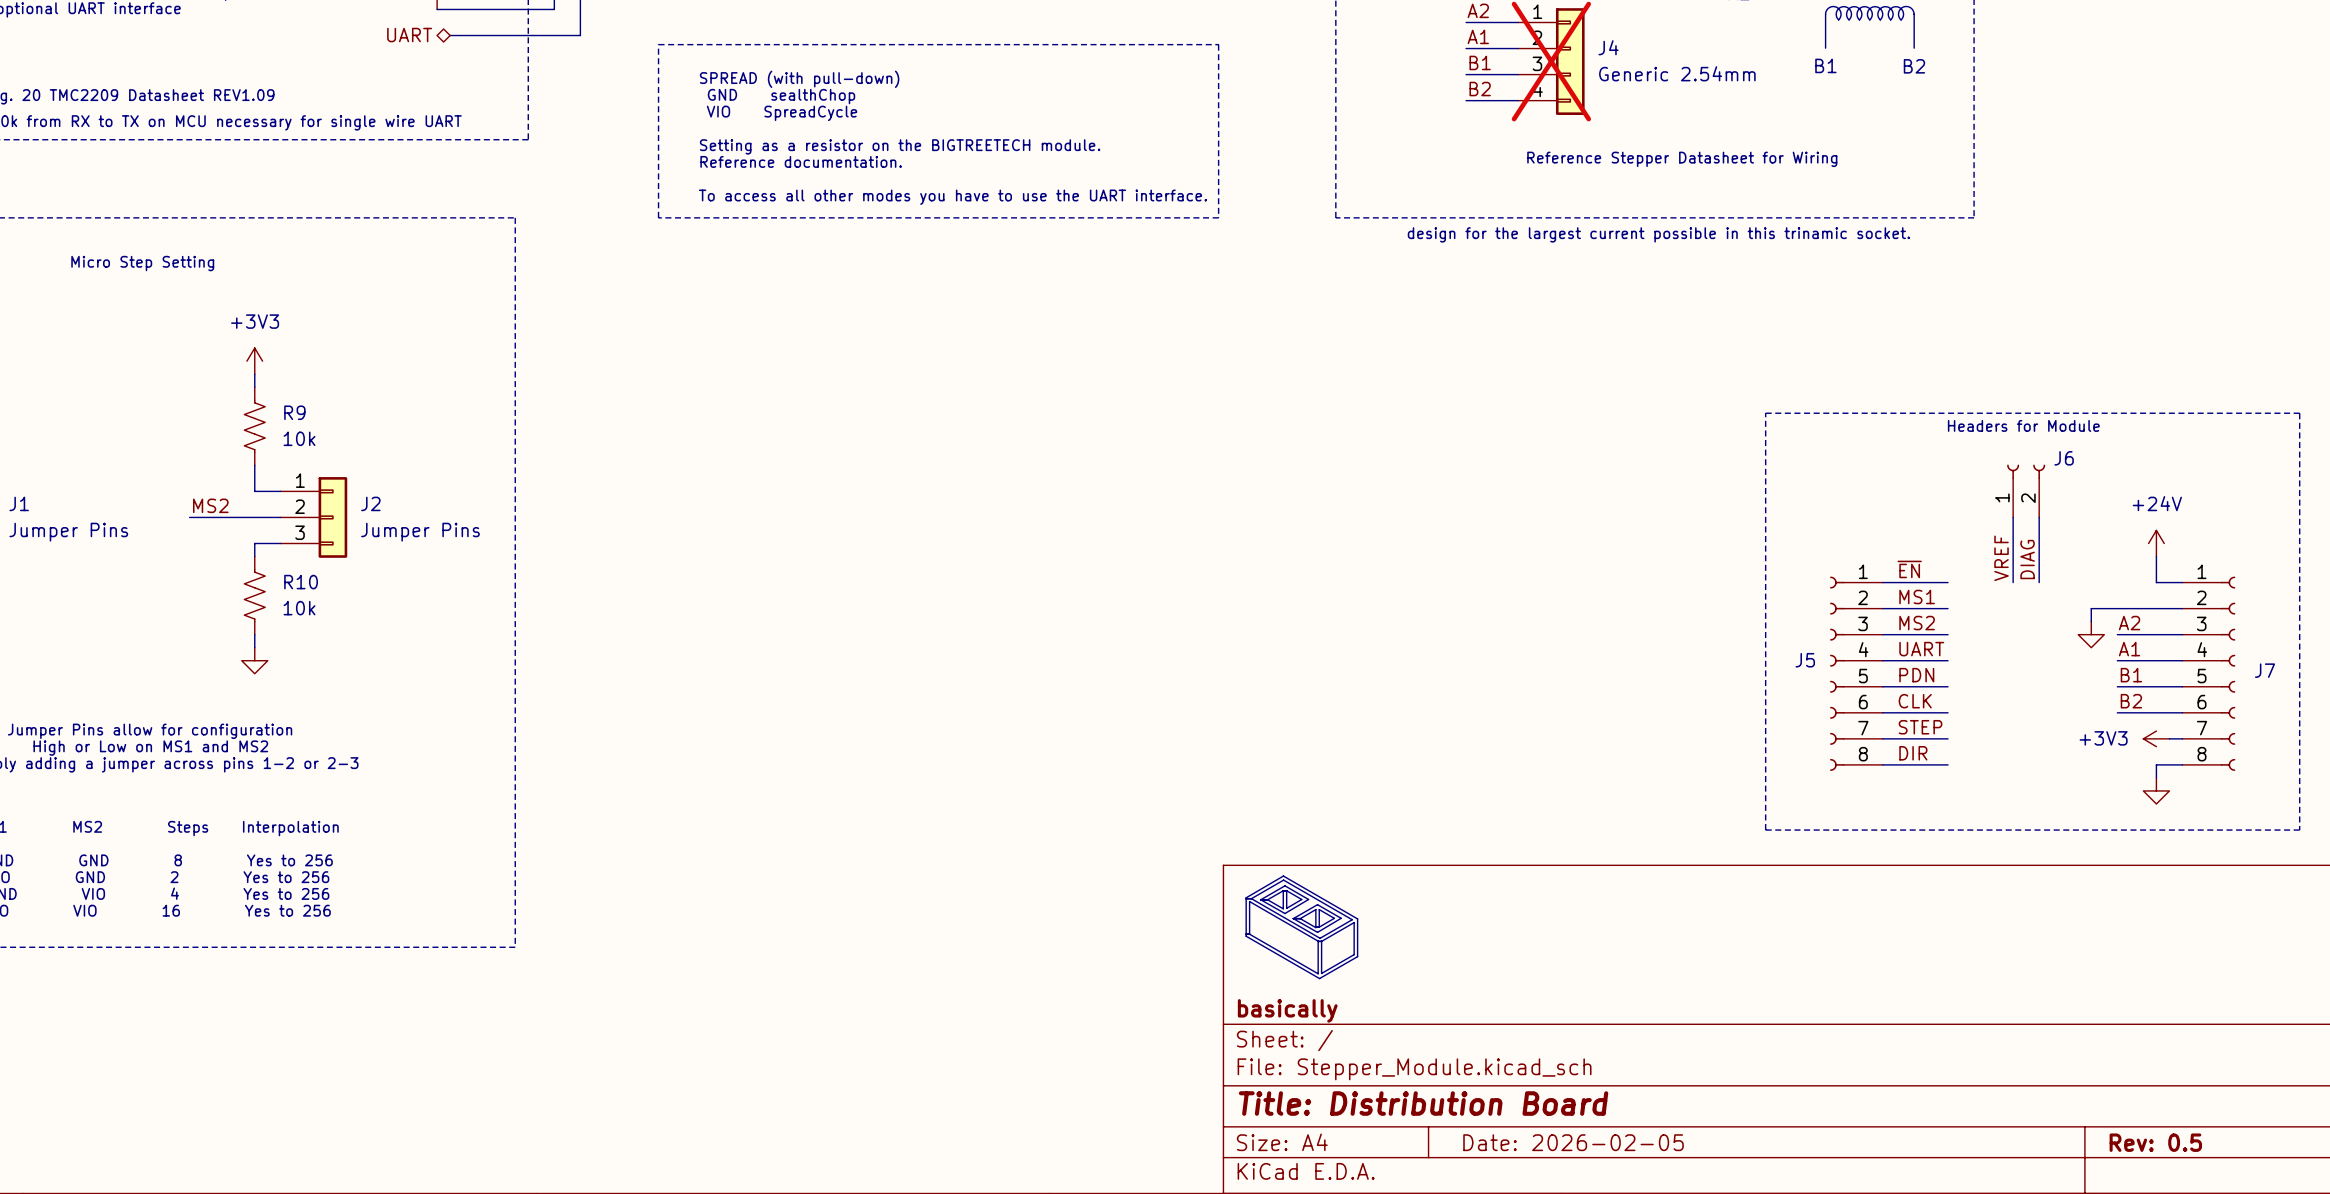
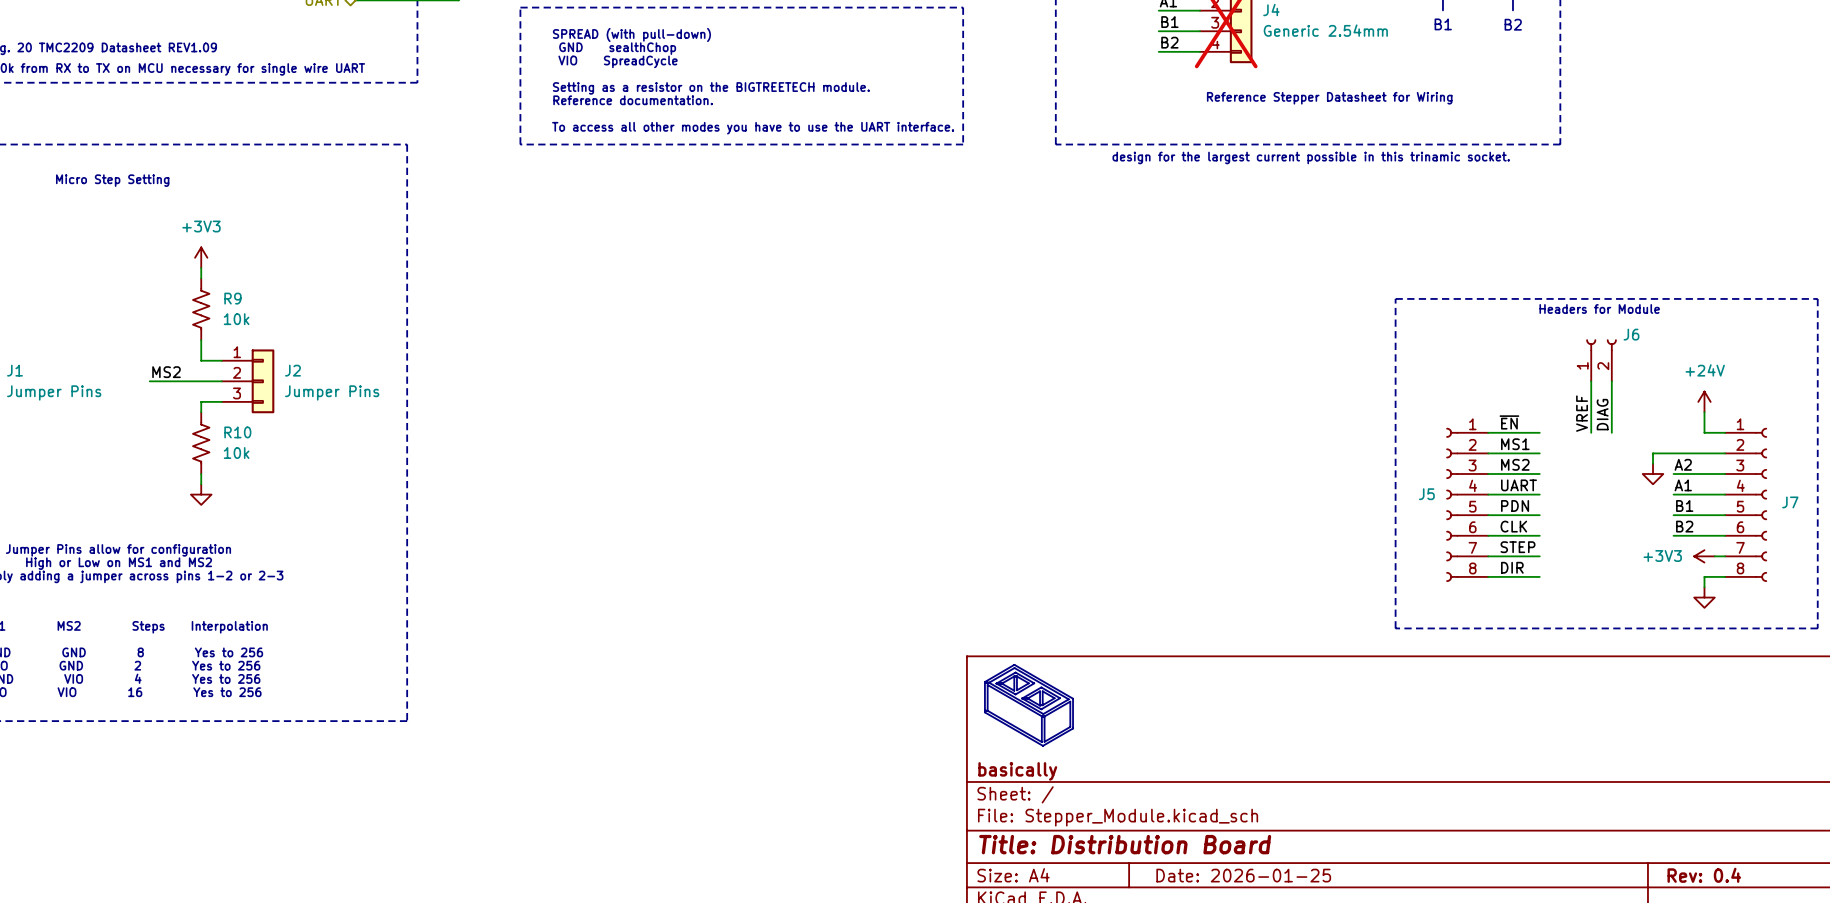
title block: Date: 2026-02-05 (1573, 1142) -> Date: 2026-01-25 (1243, 875)
title block: Rev: 0.5 (2155, 1142) -> Rev: 0.4 (1704, 875)

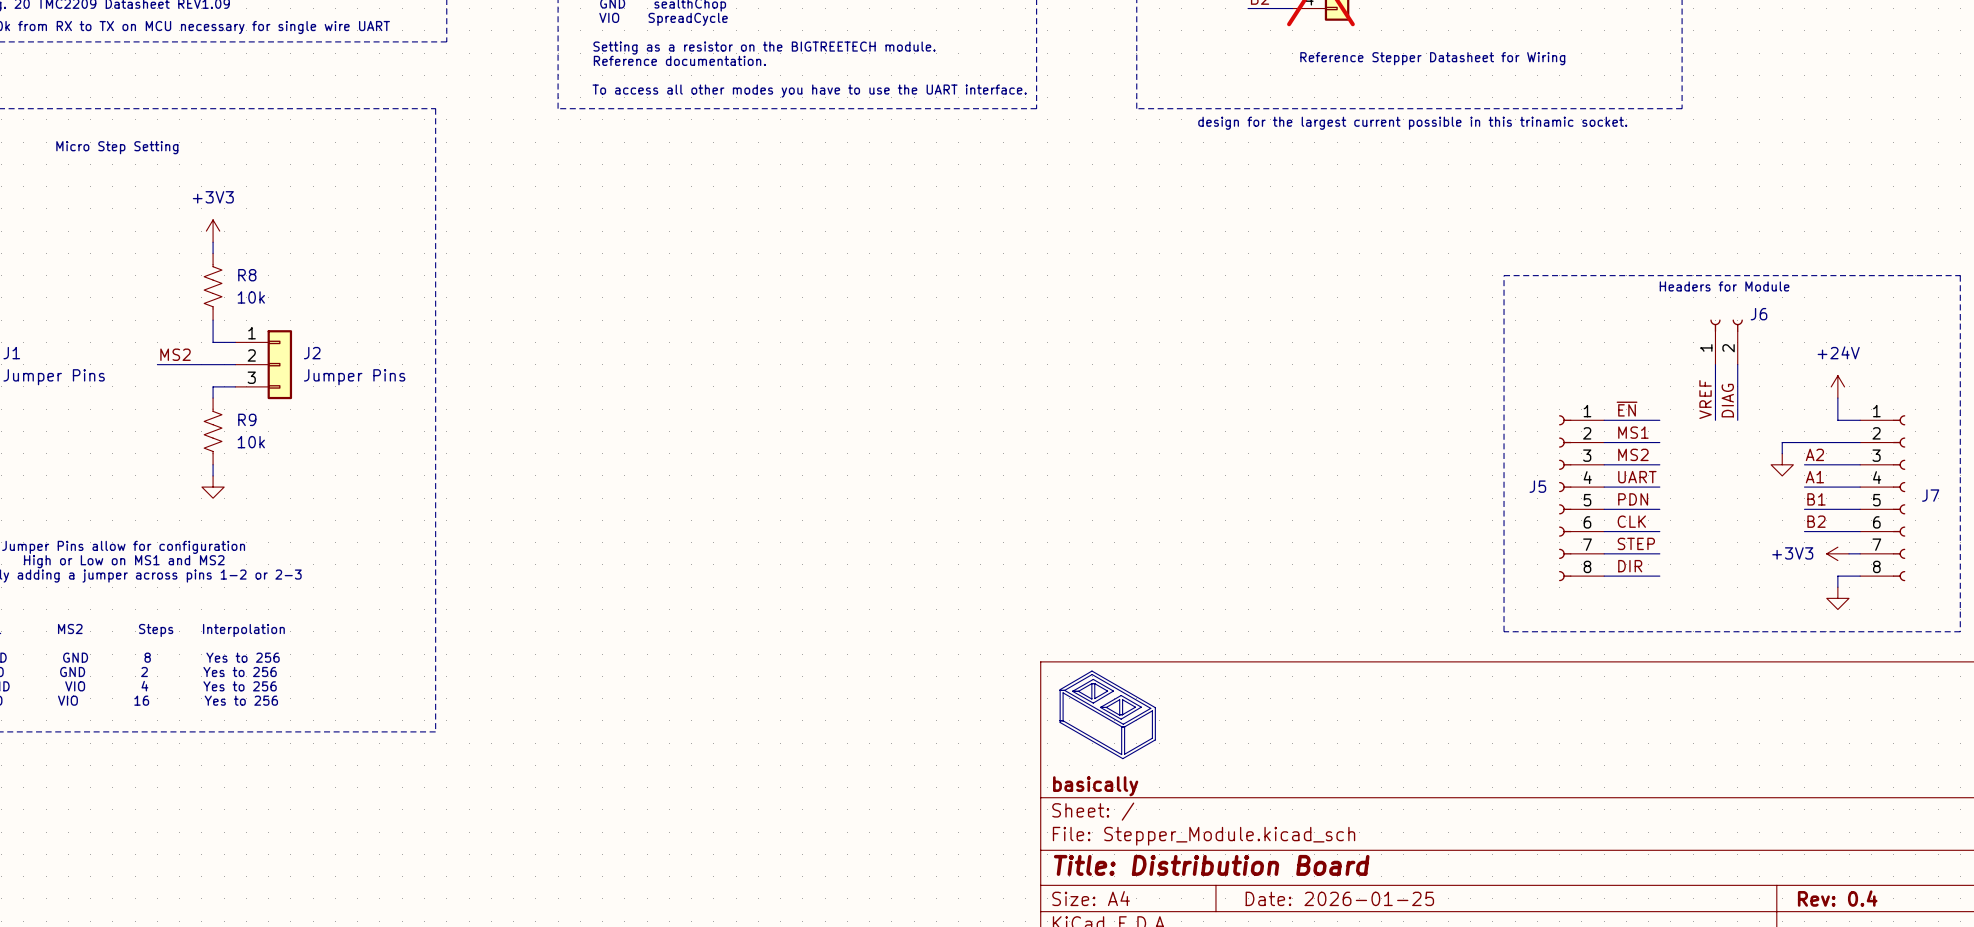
R9 name: R9 (232, 298) -> R8 (247, 275)
R10 name: R10 (237, 432) -> R9 (247, 419)

